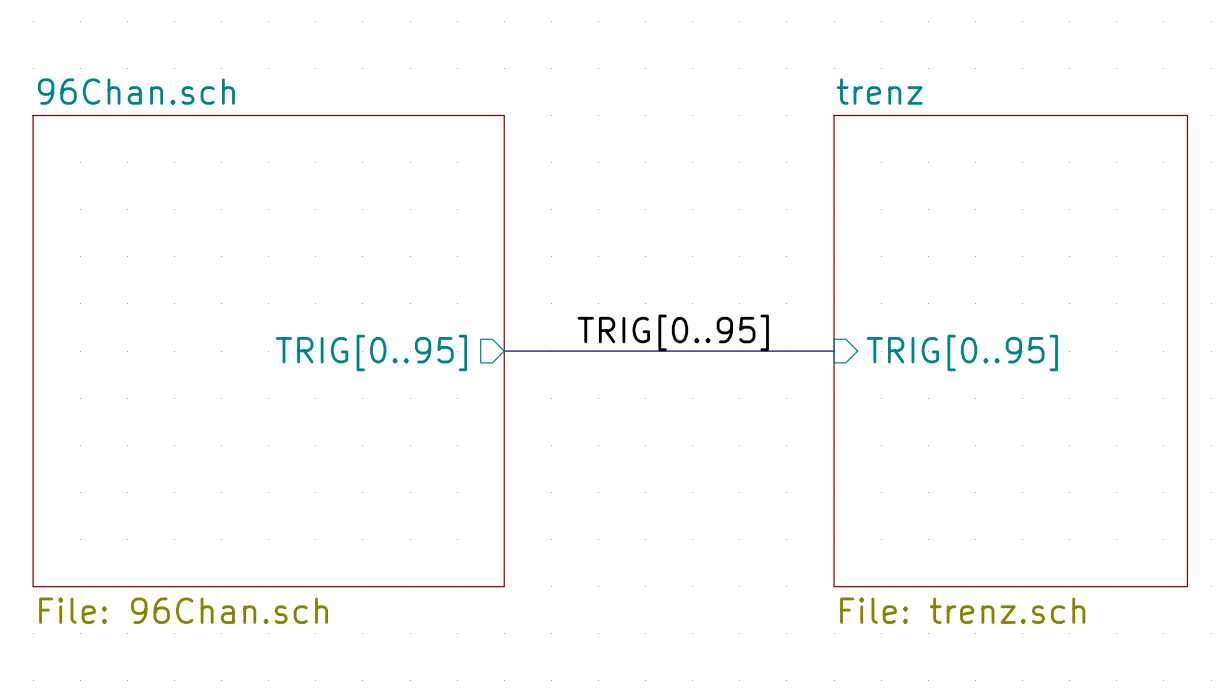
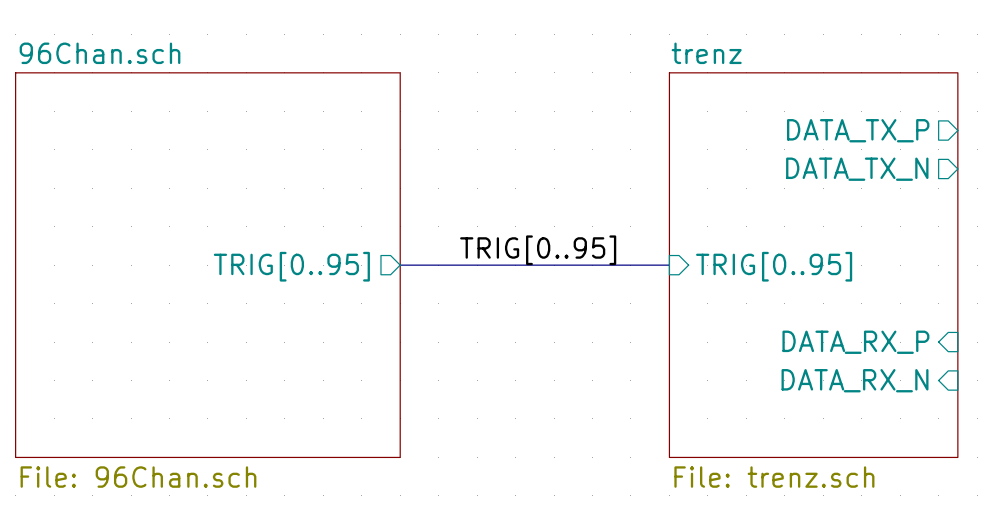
sheet pin: none -> DATA_TX_P (858, 130)
sheet pin: none -> DATA_TX_N (857, 169)
sheet pin: none -> DATA_RX_P (855, 342)
sheet pin: none -> DATA_RX_N (855, 380)

